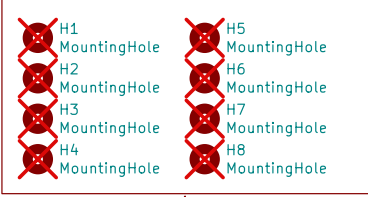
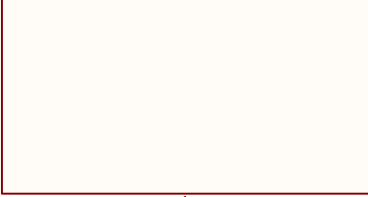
H1: MountingHole (37, 37) -> none
H5: MountingHole (204, 37) -> none
H2: MountingHole (37, 78) -> none
H6: MountingHole (204, 78) -> none
H3: MountingHole (37, 118) -> none
H7: MountingHole (204, 118) -> none
H4: MountingHole (37, 159) -> none
H8: MountingHole (204, 159) -> none

